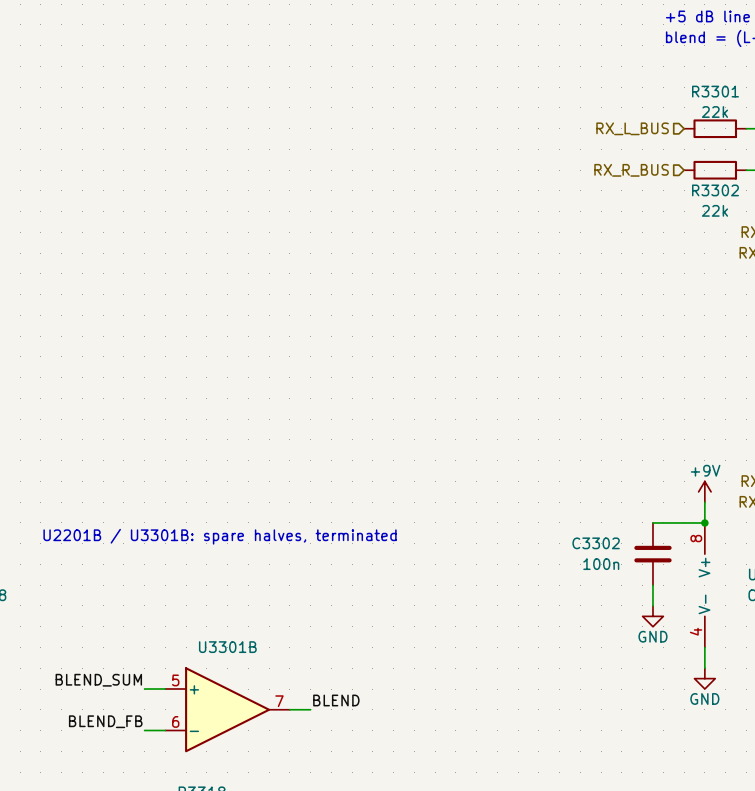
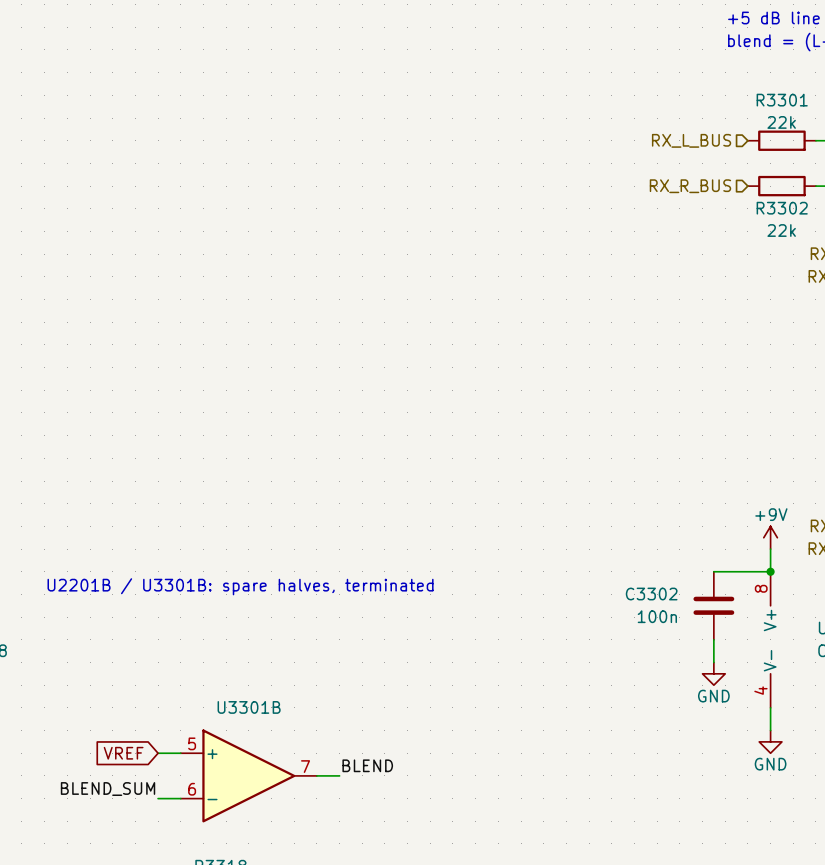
label: BLEND_SUM (98, 680) -> none
global label: none -> VREF (123, 753)
label: BLEND_FB (105, 721) -> BLEND_SUM (108, 789)

